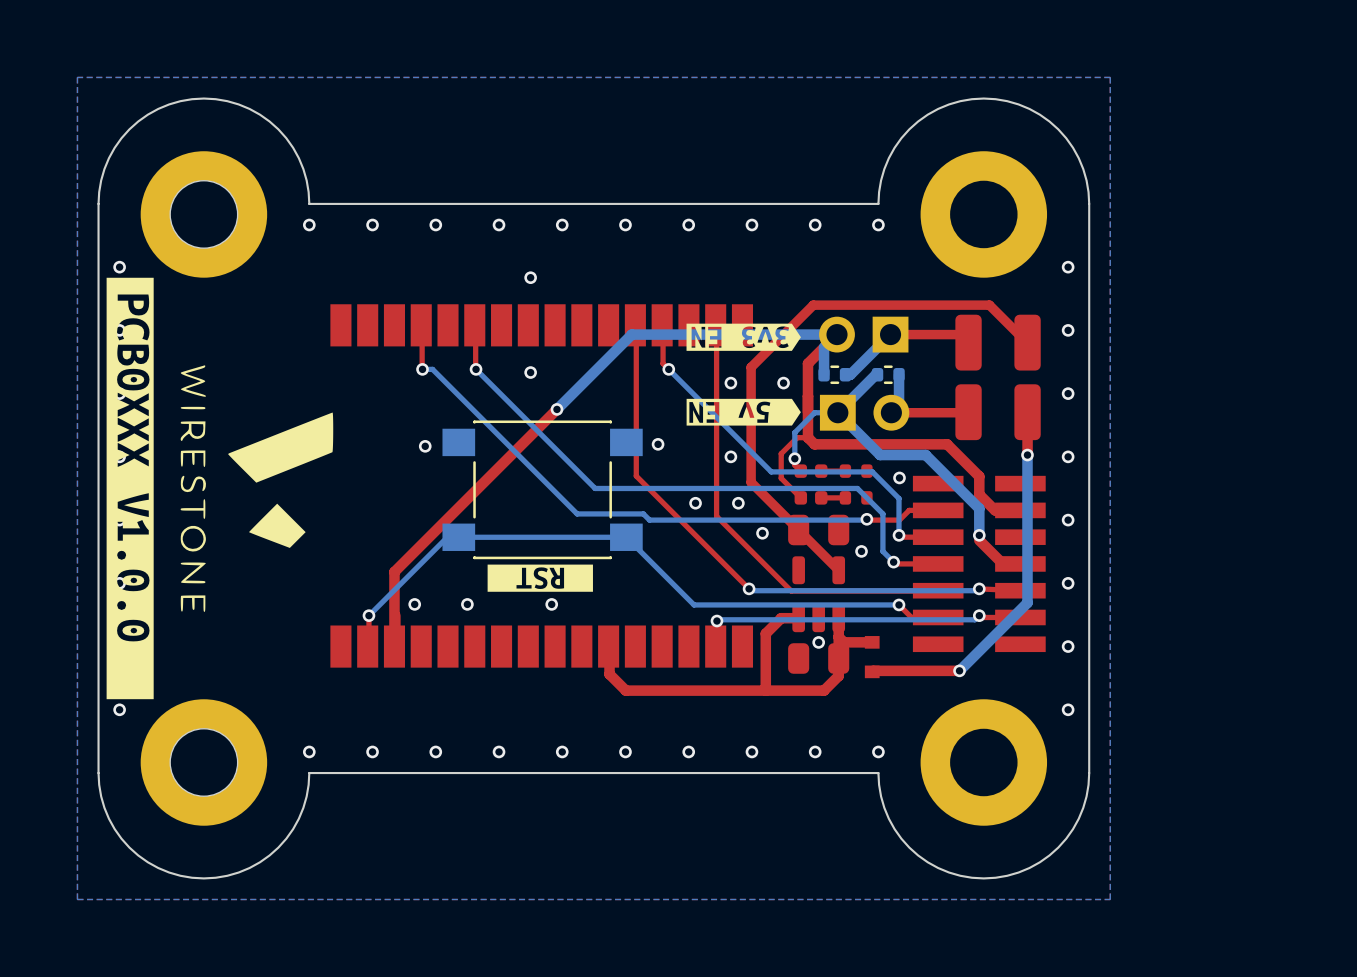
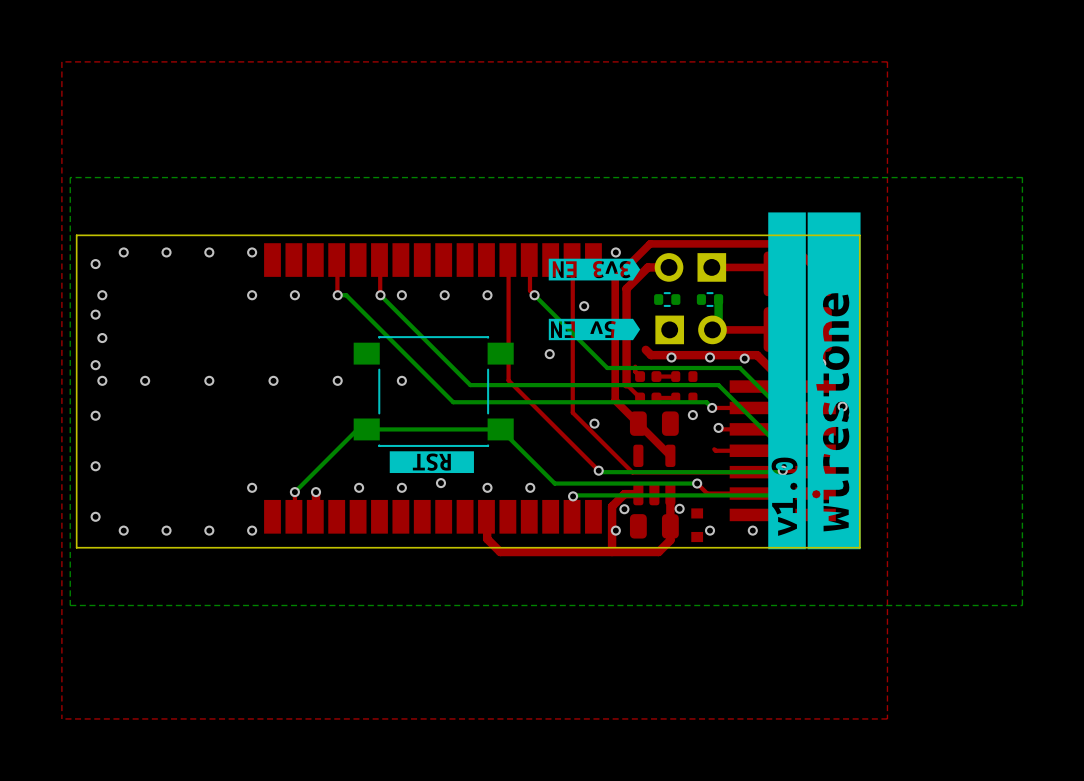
bottom zone outline: (1110, 77) (77, 77) (77, 899) (1110, 899) (1110, 77) -> (1022, 177) (1022, 605) (70, 605) (70, 177) (1022, 177)
board edge: (1089, 203) (1088, 784) (1083, 807) (1073, 829) (1058, 847) (1039, 862) (1007, 875) (983, 878) (960, 875) (927, 862) (909, 847) (894, 829) (881, 796) (878, 773) (309, 773) (303, 807) (293, 829) (278, 847) (249, 867) (215, 877) (192, 877) (158, 867) (129, 847) (114, 829) (101, 796) (98, 773) (98, 203) (101, 180) (114, 147) (129, 129) (147, 114) (180, 101) (203, 98) (227, 101) (249, 108) (278, 129) (293, 147) (306, 180) (309, 203) (878, 203) (884, 169) (894, 147) (909, 129) (927, 114) (949, 104) (972, 99) (995, 99) (1029, 108) (1058, 129) (1078, 158) (1086, 180) (1089, 203) -> none
part: (203, 214) -> none
part: (983, 214) -> none
via: (309, 225) -> none
via: (372, 225) -> none
via: (435, 225) -> none
via: (499, 225) -> none
via: (562, 225) -> none
via: (625, 225) -> none
via: (688, 225) -> none
via: (751, 225) -> none
via: (815, 225) -> none
via: (878, 225) -> none
drawing: none -> [768, 212, 861, 550]
via: (119, 267) -> none
via: (1068, 267) -> none
drawing: [106, 277, 154, 700] -> none
via: (530, 277) -> none
board edge: none -> (859, 235) (76, 235) (76, 547) (859, 547) (859, 235)
via: none -> (123, 252)
via: none -> (166, 252)
via: none -> (209, 252)
via: none -> (252, 252)
via: none -> (615, 252)
top track: (837, 334) (807, 363) (807, 437) (797, 437) (781, 453) (781, 478) (783, 480) -> (669, 267) (647, 267) (626, 288) (626, 384)
bottom track: (890, 334) (850, 374) (845, 374) -> none
top track: (769, 348) (751, 367) (751, 482) (769, 501) -> (615, 278) (615, 400)
drawing: [180, 365, 334, 612] -> none
via: none -> (102, 295)
via: none -> (252, 295)
via: none -> (294, 295)
bottom track: (432, 369) (577, 513) (643, 513) (649, 520) (866, 519) -> (345, 295) (453, 402) (706, 402) (712, 407)
via: none -> (401, 295)
via: none -> (444, 295)
via: none -> (487, 295)
via: (530, 372) -> none
bottom track: (824, 374) (824, 347) (837, 334) (631, 334) (556, 409) -> none
bottom track: (877, 374) (837, 412) -> none
via: (783, 383) -> none
via: (1068, 393) -> none
top track: (556, 409) (394, 571) (394, 646) -> none
via: (556, 409) -> none
bottom track: (837, 412) (880, 455) (925, 455) (979, 508) (979, 535) -> none
bottom track: (837, 412) (814, 412) (794, 432) (794, 458) -> none
via: none -> (102, 338)
via: none -> (549, 354)
via: (658, 444) -> none
via position: (425, 446) -> (337, 380)
via: none -> (671, 357)
via: none -> (710, 357)
via: none -> (744, 358)
bottom track: (1027, 455) (1027, 602) (959, 670) -> none
via: (730, 456) -> none
via: (1068, 456) -> none
via: (794, 458) -> none
bottom track: (759, 460) (771, 471) (872, 471) (899, 498) (899, 535) -> (607, 368) (739, 368) (774, 402) (782, 402)
via: none -> (102, 380)
via: none -> (145, 380)
via: none -> (209, 380)
via: none -> (273, 380)
via: none -> (401, 380)
via: (899, 477) -> none
bottom track: (588, 481) (595, 488) (857, 488) (882, 513) (882, 551) (893, 562) -> (470, 385) (718, 385) (782, 449)
via: (695, 503) -> none
via: (738, 503) -> none
via: none -> (842, 406)
via: none -> (712, 407)
top track: (909, 510) (899, 520) (866, 519) -> (726, 407) (712, 407)
via: none -> (594, 423)
via: (762, 533) -> none
via: (861, 551) -> none
via: (893, 562) -> none
via: (414, 604) -> none
via: (467, 604) -> none
via: none -> (697, 483)
top track: (899, 604) (911, 617) -> (697, 483) (707, 493) (728, 493)
bottom track: (899, 604) (872, 604) -> none
via: (899, 604) -> none
via: none -> (252, 487)
via: none -> (359, 487)
via: none -> (401, 487)
via: none -> (487, 487)
via: none -> (530, 487)
via: none -> (316, 492)
via: none -> (679, 508)
via: none -> (624, 509)
top track: (838, 637) (843, 642) (872, 642) -> none
via: (818, 642) -> none
via: none -> (123, 530)
via: none -> (166, 530)
via: none -> (209, 530)
via: none -> (252, 530)
via: none -> (615, 530)
via: none -> (710, 530)
top track: (959, 670) (872, 671) -> none
via position: (959, 670) -> (752, 530)
via: (119, 709) -> none
via: (1068, 709) -> none
via: (309, 751) -> none
via: (372, 751) -> none
via: (435, 751) -> none
via: (499, 751) -> none
via: (562, 751) -> none
via: (625, 751) -> none
via: (688, 751) -> none
via: (751, 751) -> none
via: (815, 751) -> none
via: (878, 751) -> none
part: (203, 762) -> none
part: (983, 762) -> none

